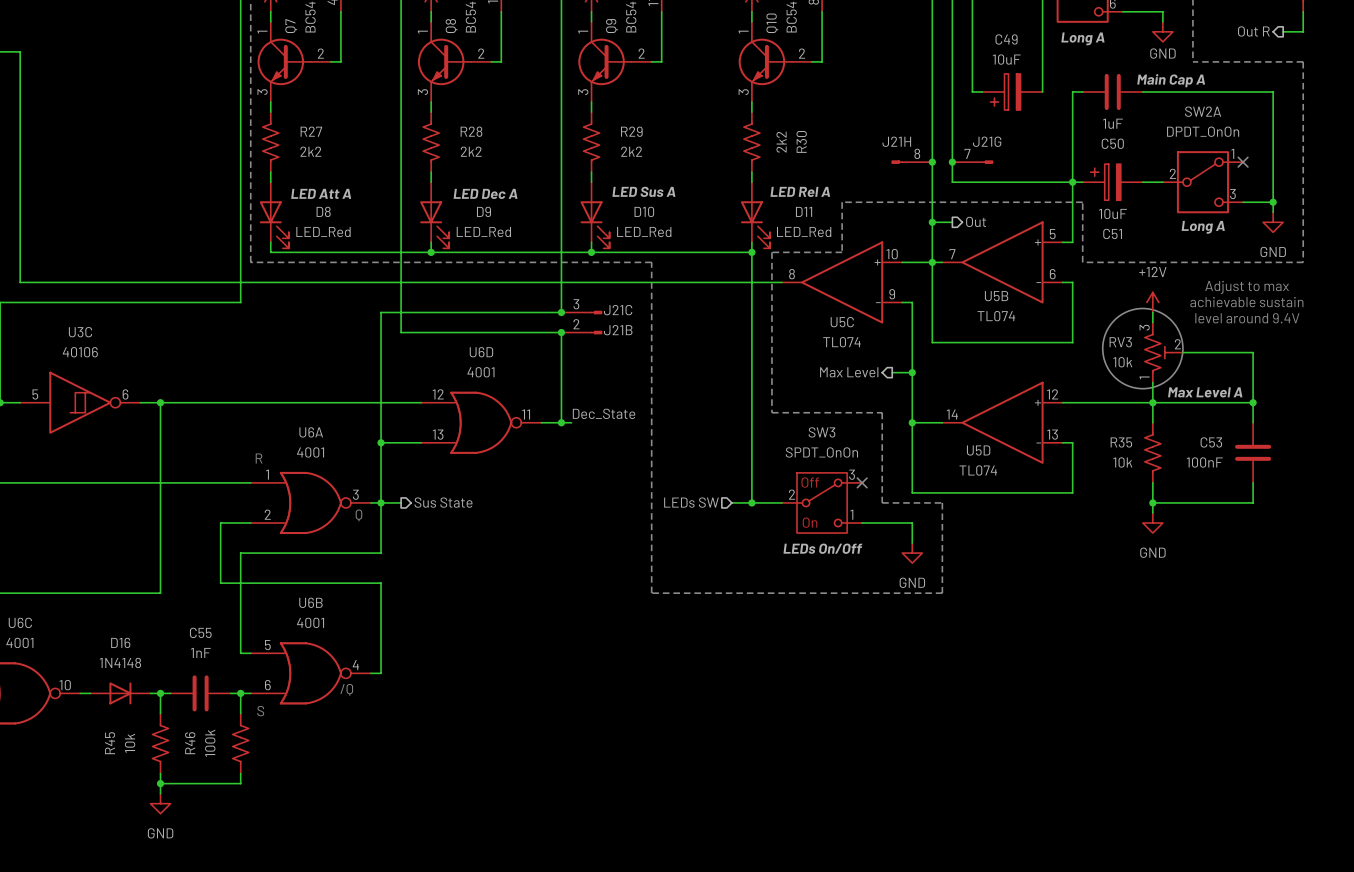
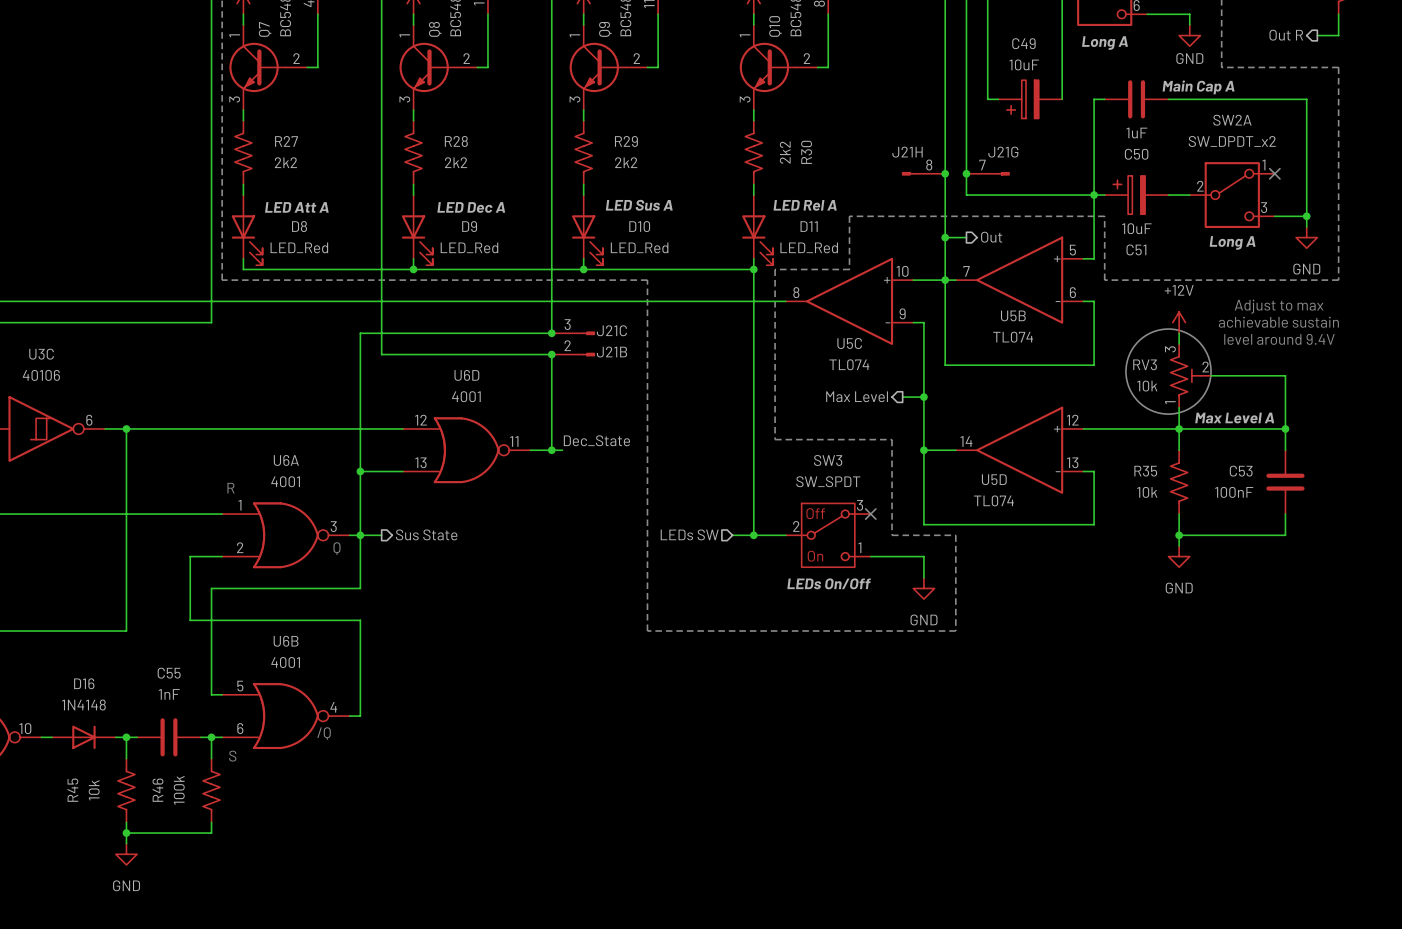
SW2A value: DPDT_OnOn (1203, 131) -> SW_DPDT_x2 (1232, 141)
SW3 value: SPDT_OnOn (821, 452) -> SW_SPDT (828, 481)

